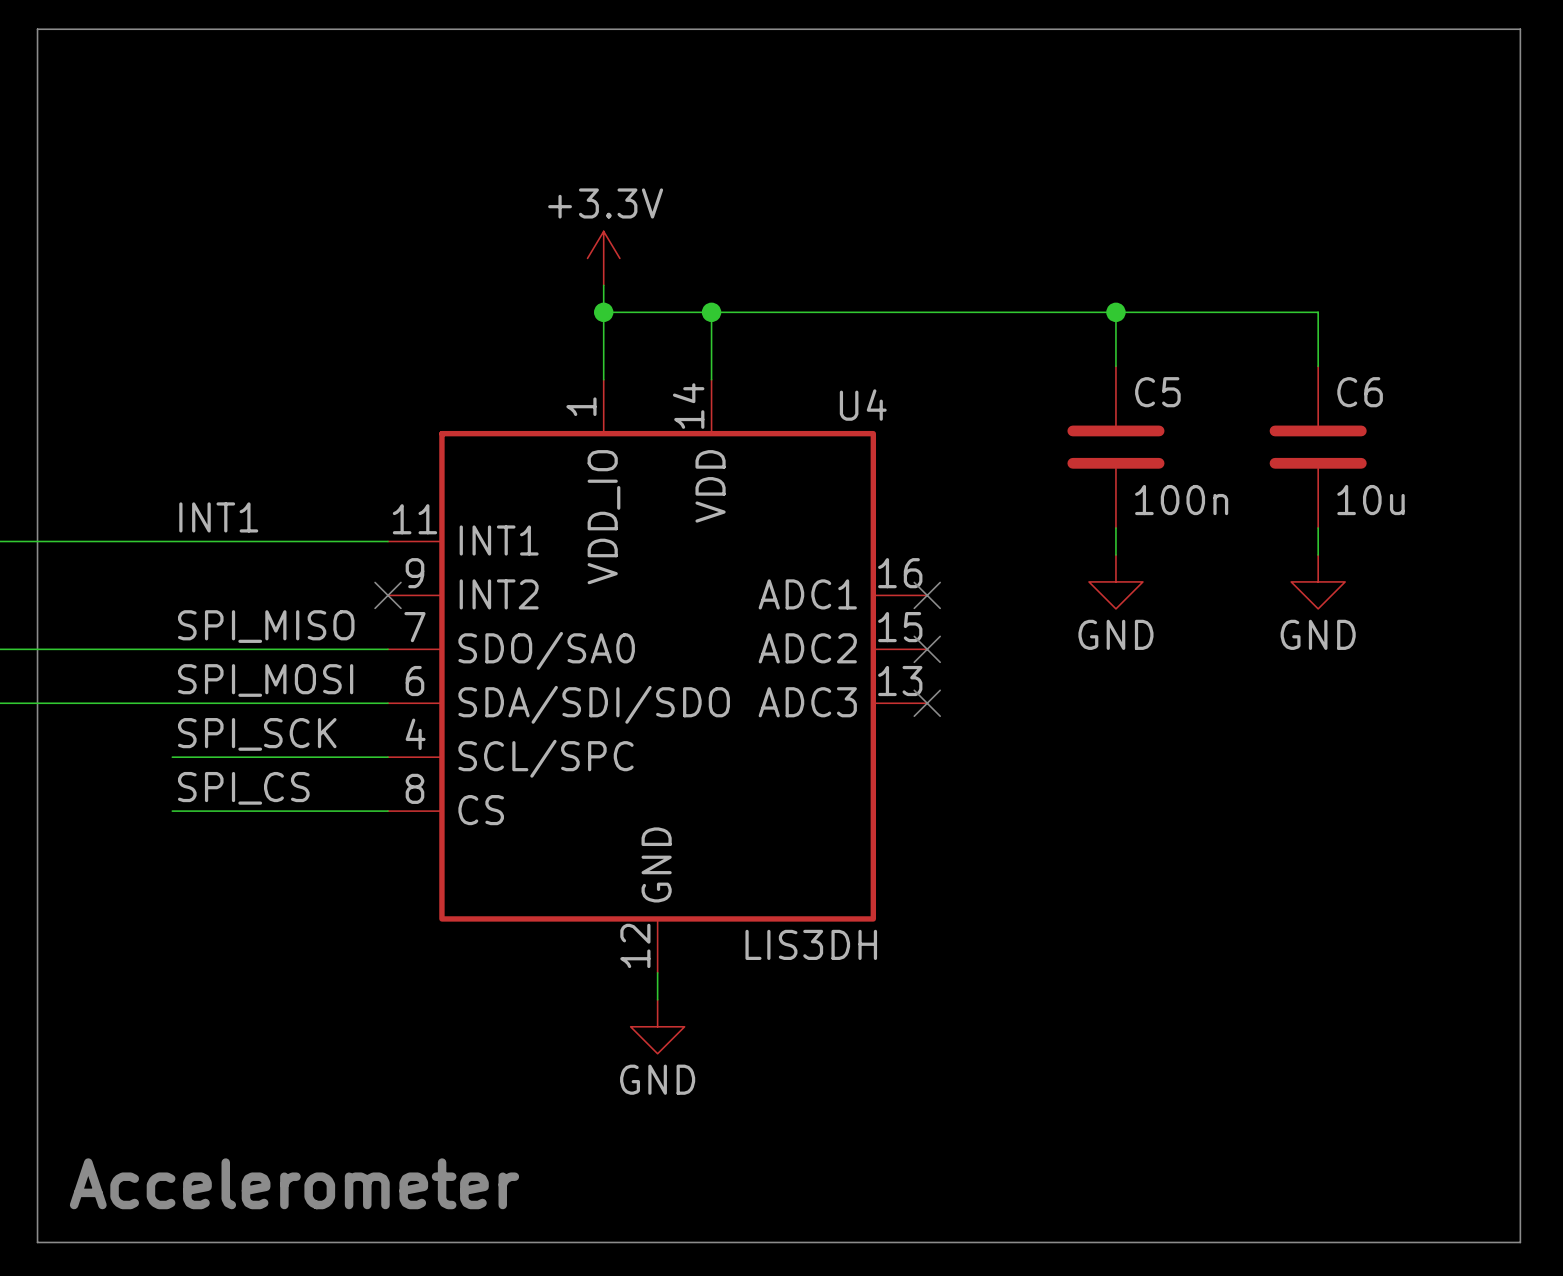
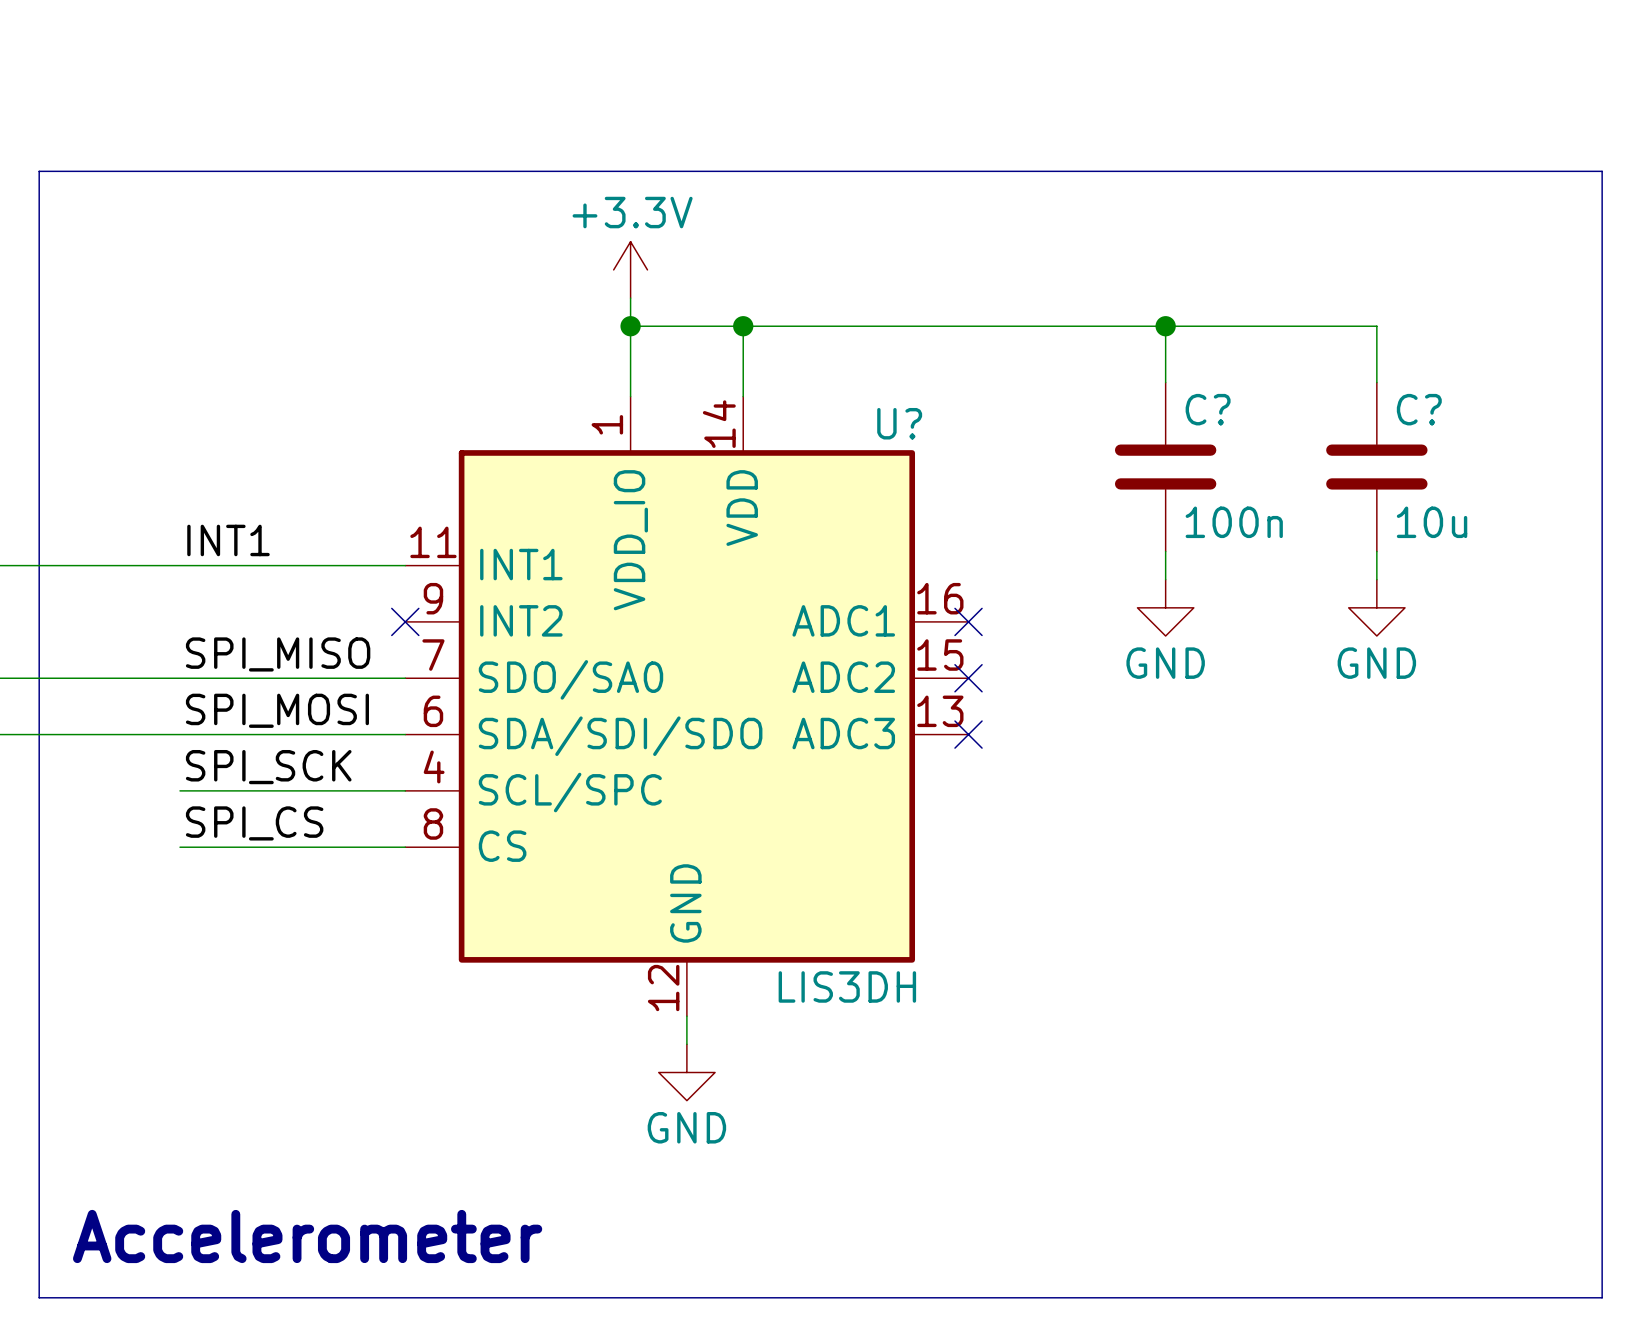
line: (37, 164) (37, 29) (1520, 29) (1520, 1242) -> (39, 171) (1602, 171) (1602, 1297) (1588, 1297)
C5 name: C5 (1157, 392) -> C? (1208, 409)
C6 name: C6 (1360, 392) -> C? (1419, 409)
U4 name: U4 (863, 405) -> U? (899, 423)

